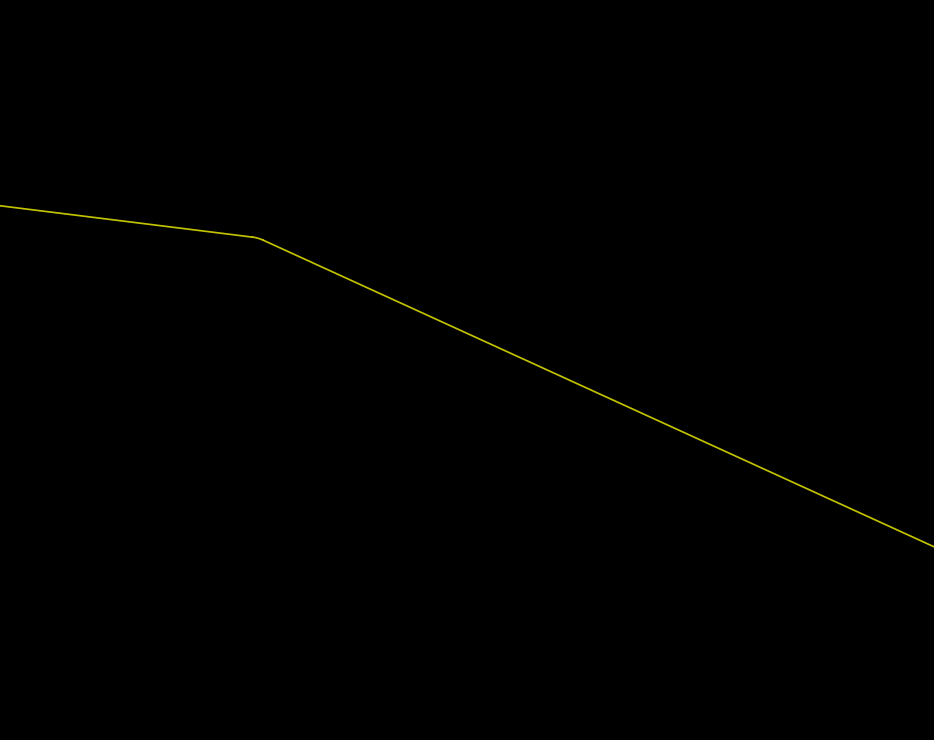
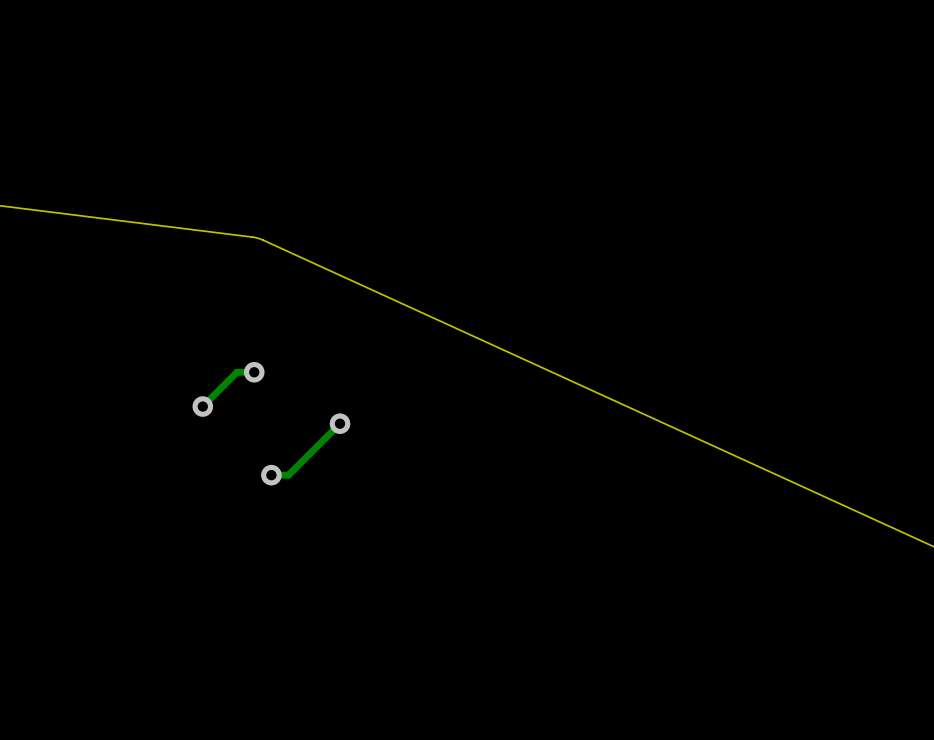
track: none -> (254, 372) (237, 372) (202, 406)
via: none -> (254, 372)
via: none -> (202, 406)
track: none -> (340, 423) (288, 475) (271, 475)
via: none -> (340, 423)
via: none -> (271, 475)

